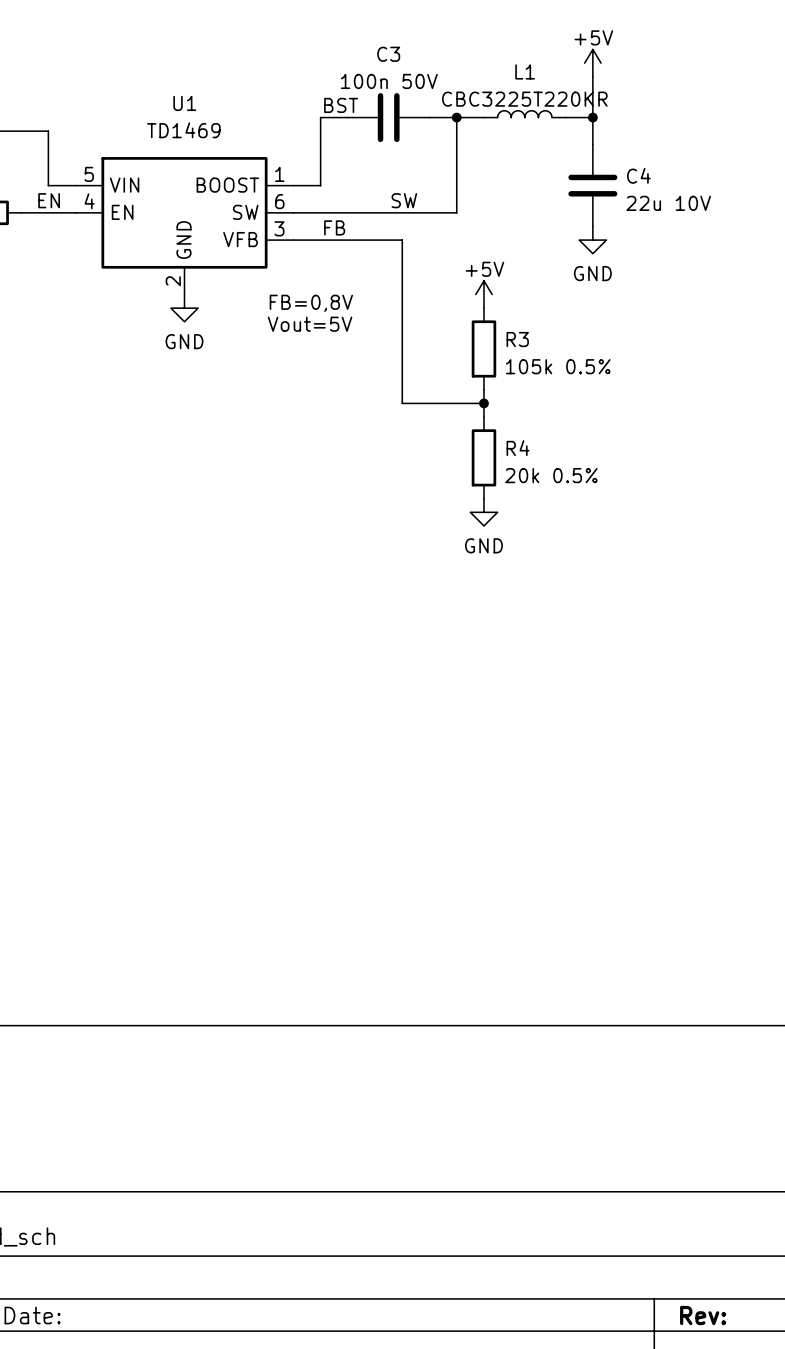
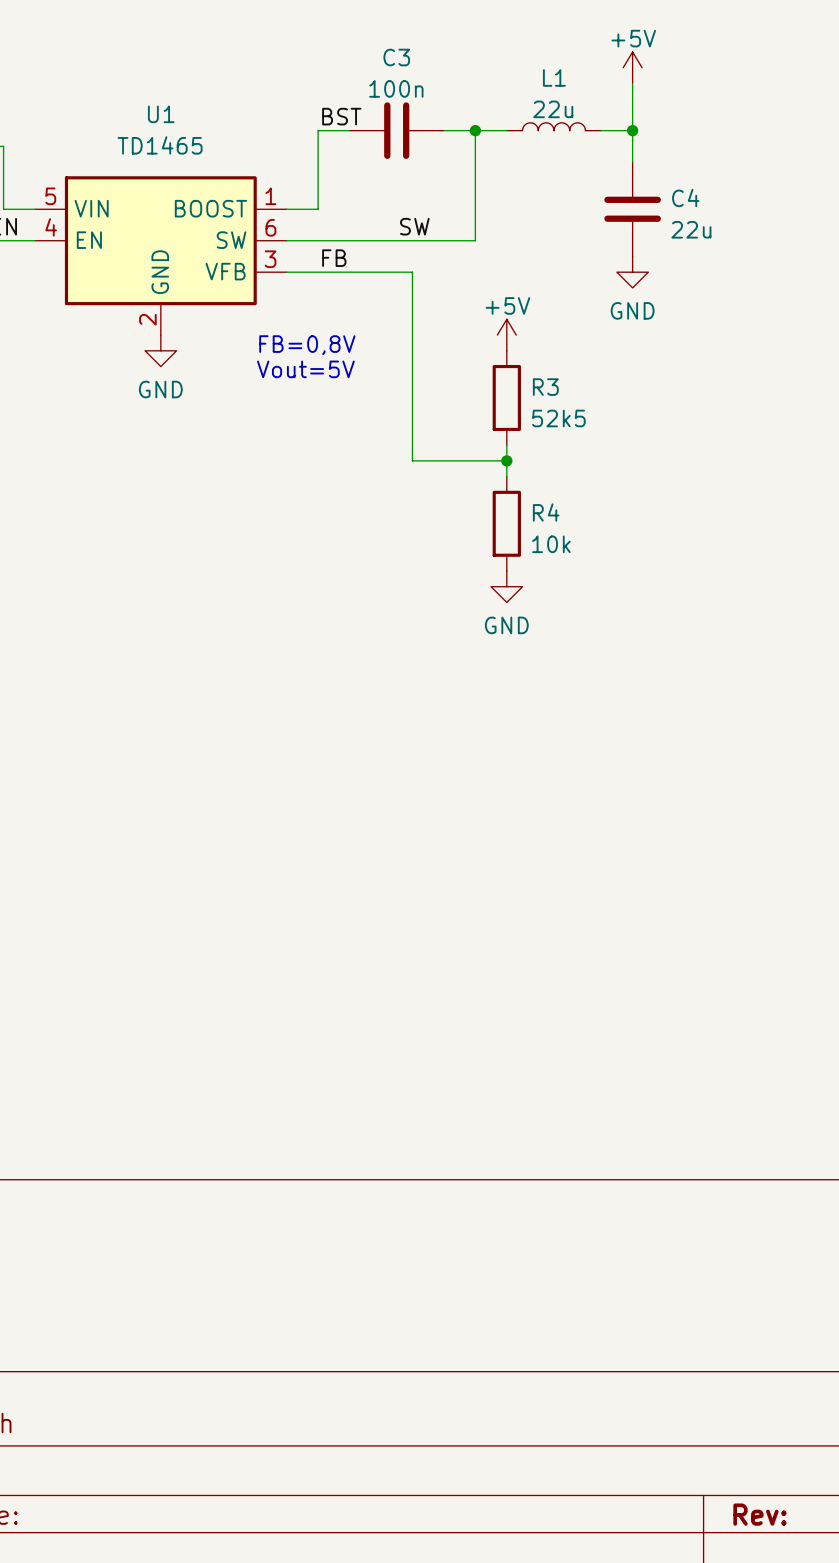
C3 value: 100n 50V (389, 81) -> 100n (396, 88)
L1 value: CBC3225T220KR (524, 99) -> 22u (553, 109)
U1 value: TD1469 (183, 130) -> TD1465 (160, 145)
C4 value: 22u 10V (668, 203) -> 22u (691, 229)
R3 value: 105k 0.5% (558, 366) -> 52k5 (558, 418)
R4 value: 20k 0.5% (551, 475) -> 10k (551, 544)

